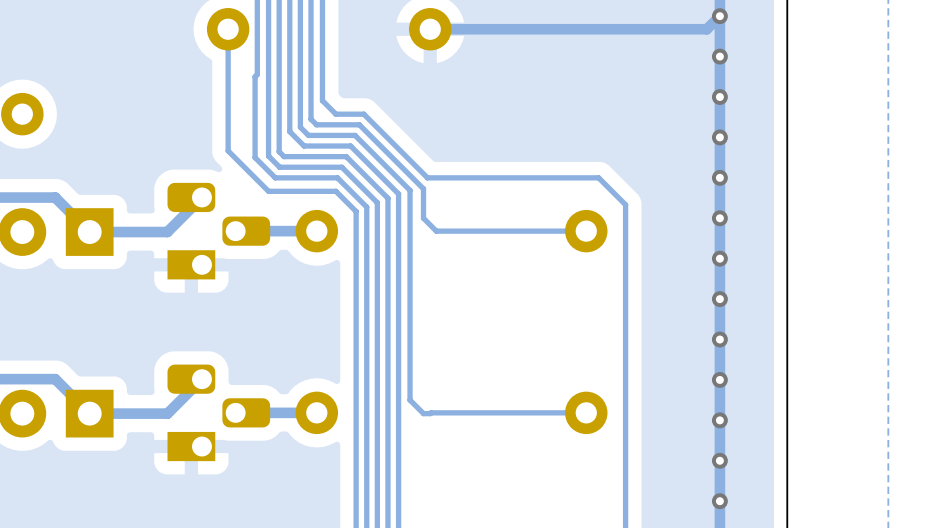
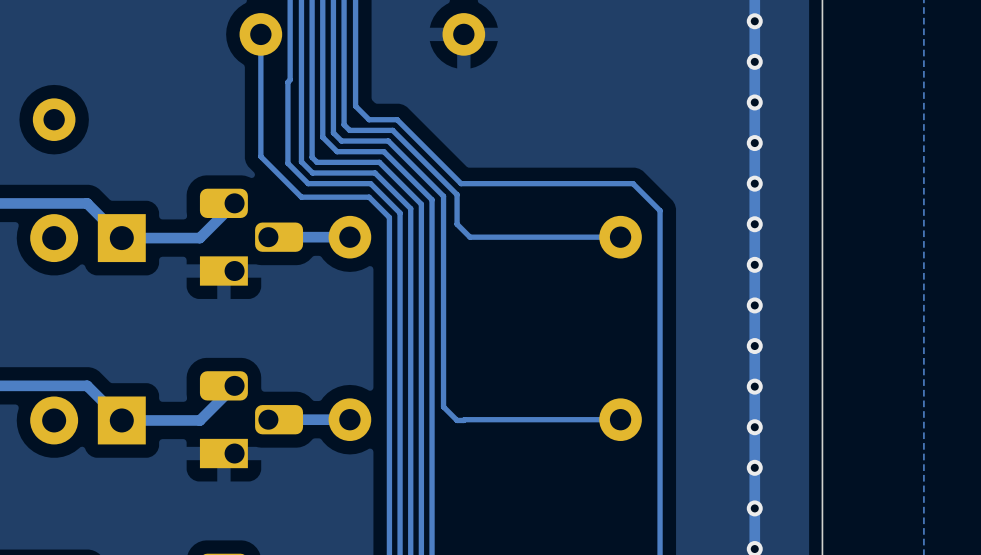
track: (719, 16) (706, 29) (430, 29) -> none

